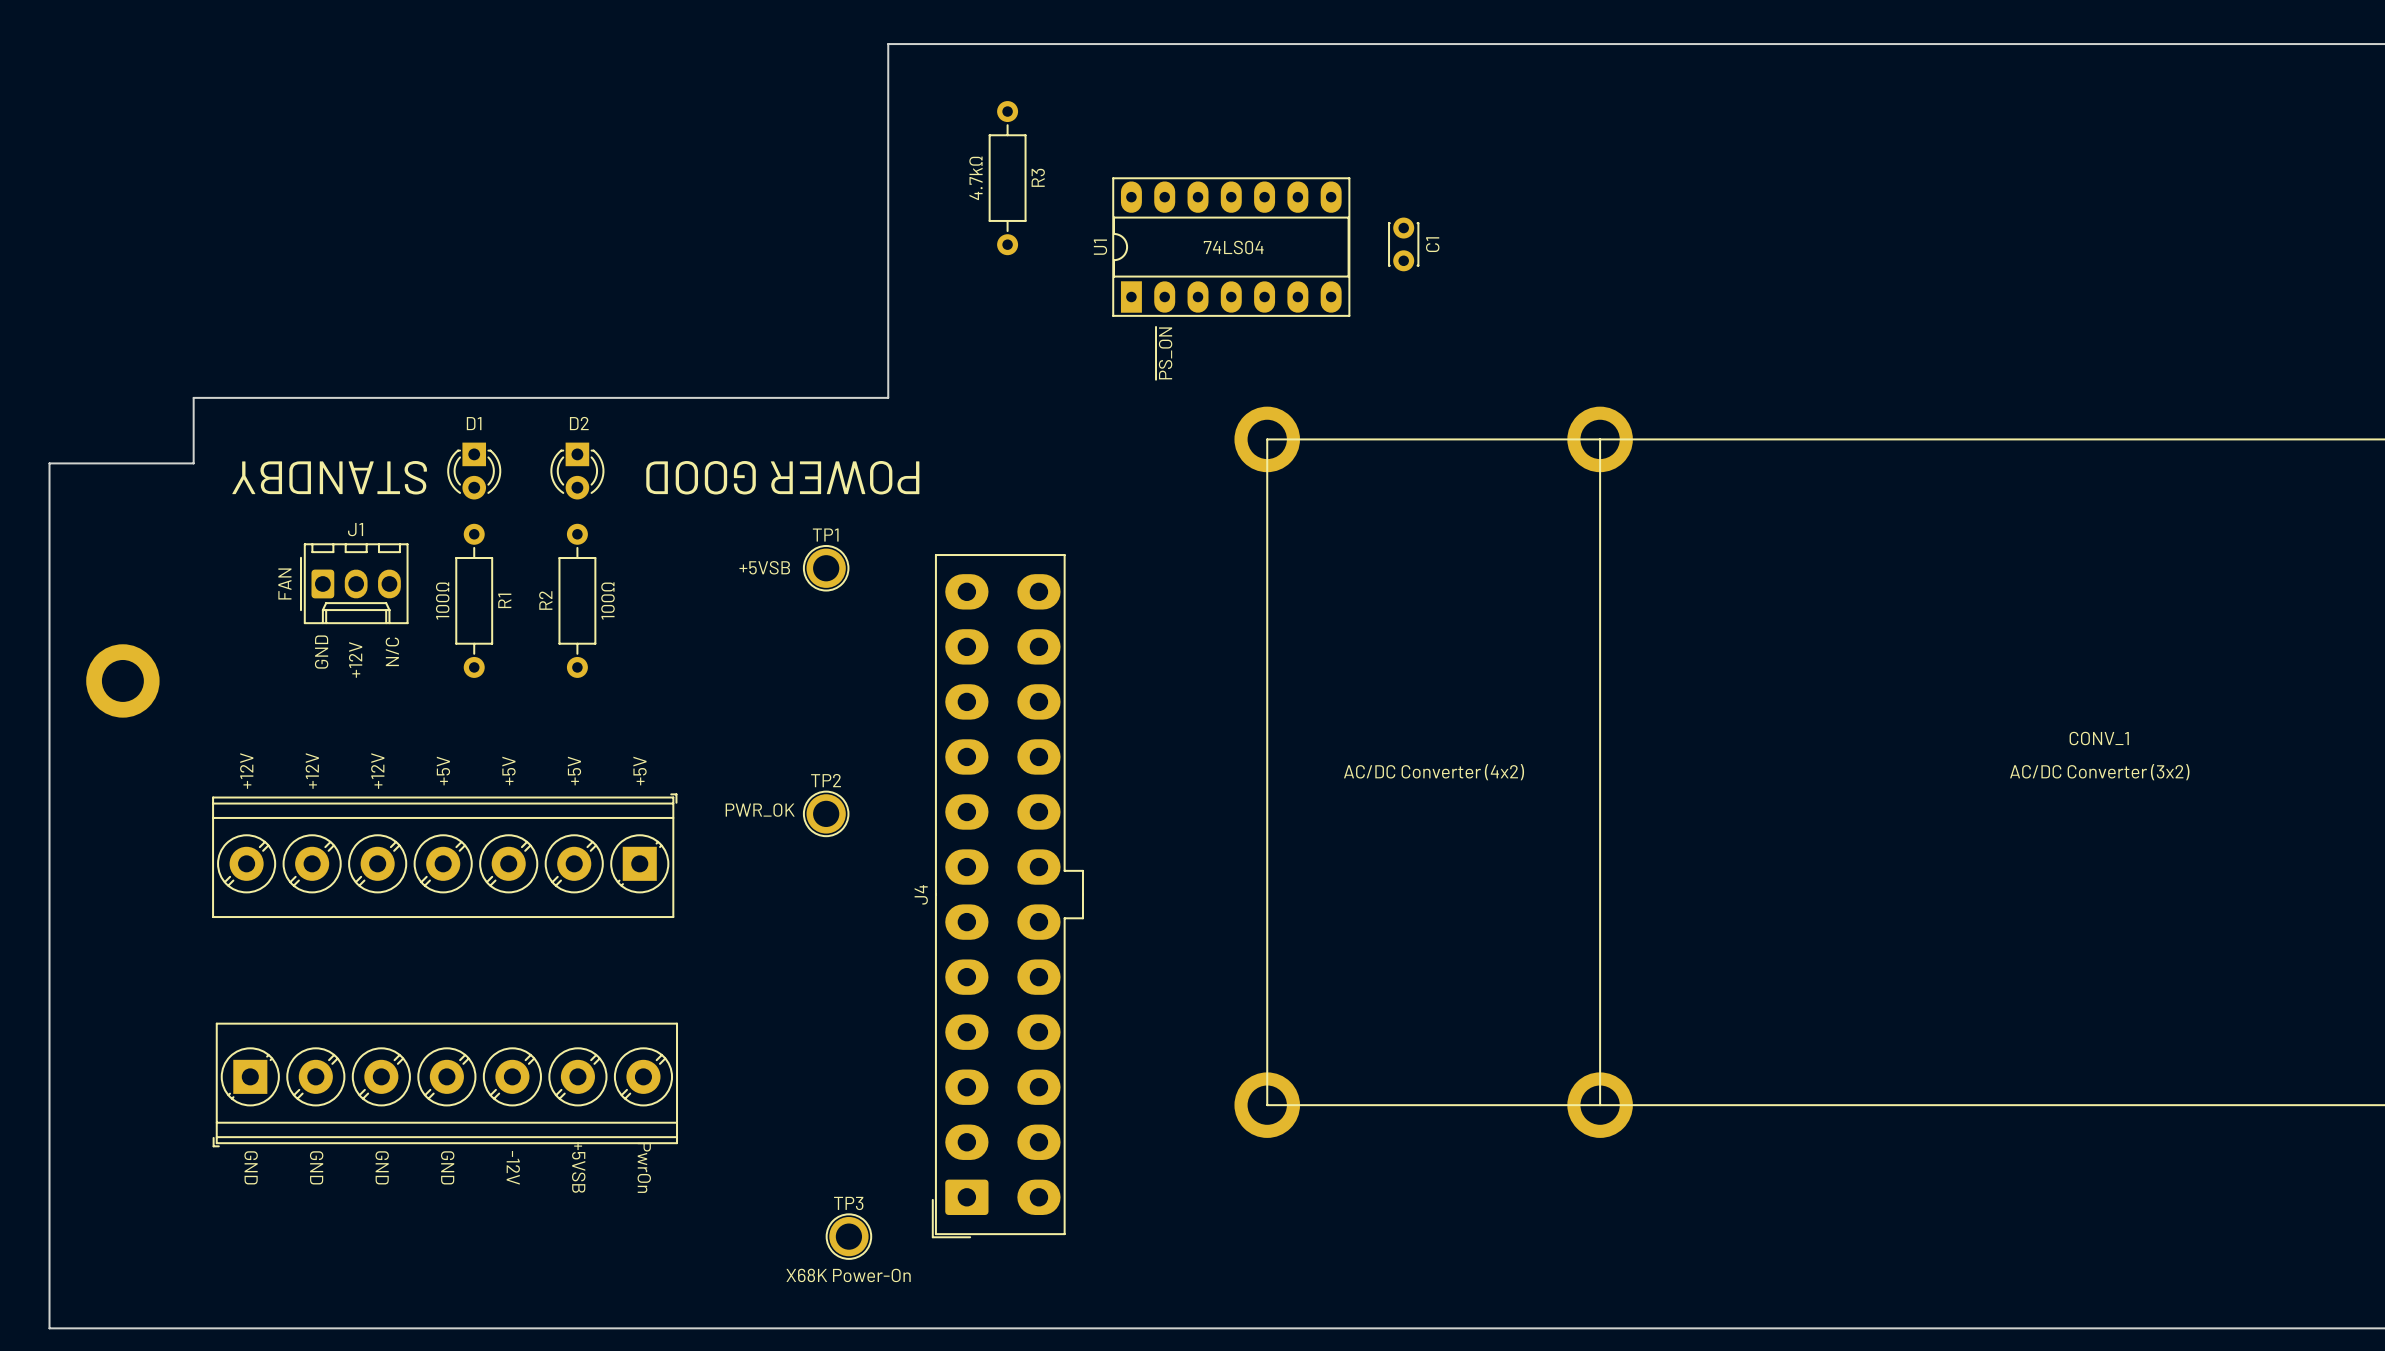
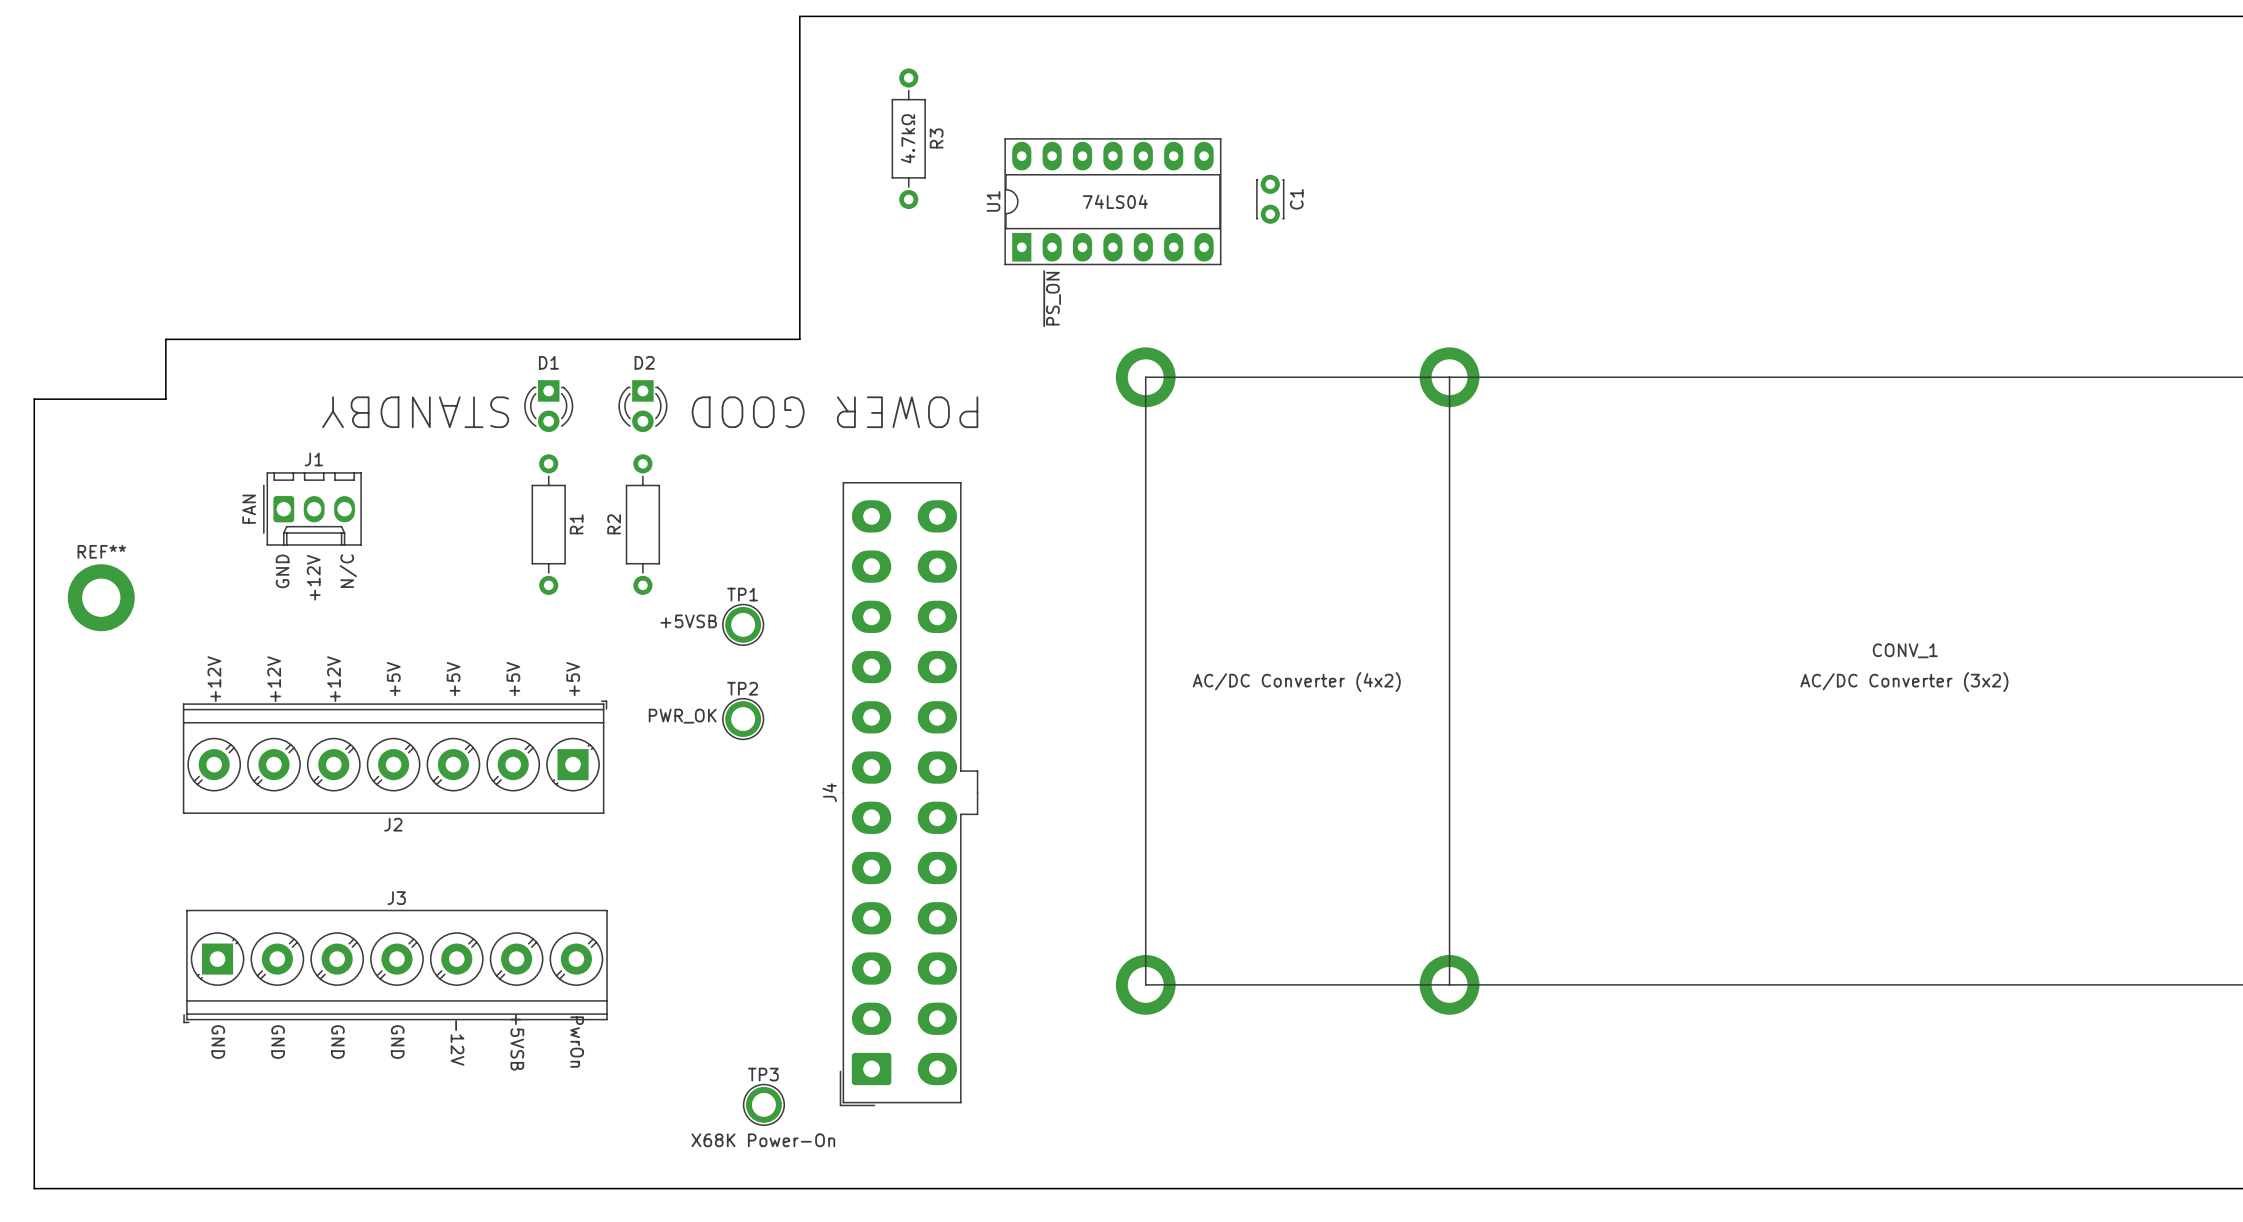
R3 value: 4.7kΩ (975, 178) -> none
text: none -> 4.7kΩ (908, 138)
D1 position: (474, 471) -> (548, 406)
D2 position: (577, 471) -> (642, 406)
text position: STANDBY (329, 477) -> STANDBY (415, 412)
text position: POWER GOOD (782, 477) -> POWER GOOD (834, 412)
text position: +5VSB (764, 567) -> +5VSB (688, 621)
TP1 position: (826, 568) -> (743, 624)
R1 value: 100Ω (442, 600) -> none
R1 position: (474, 600) -> (548, 524)
R2 position: (577, 600) -> (642, 524)
R2 value: 100Ω (607, 600) -> none
REF** name: none -> REF** (101, 551)
J2 name: none -> J2 (393, 824)
J3 name: none -> J3 (396, 898)

